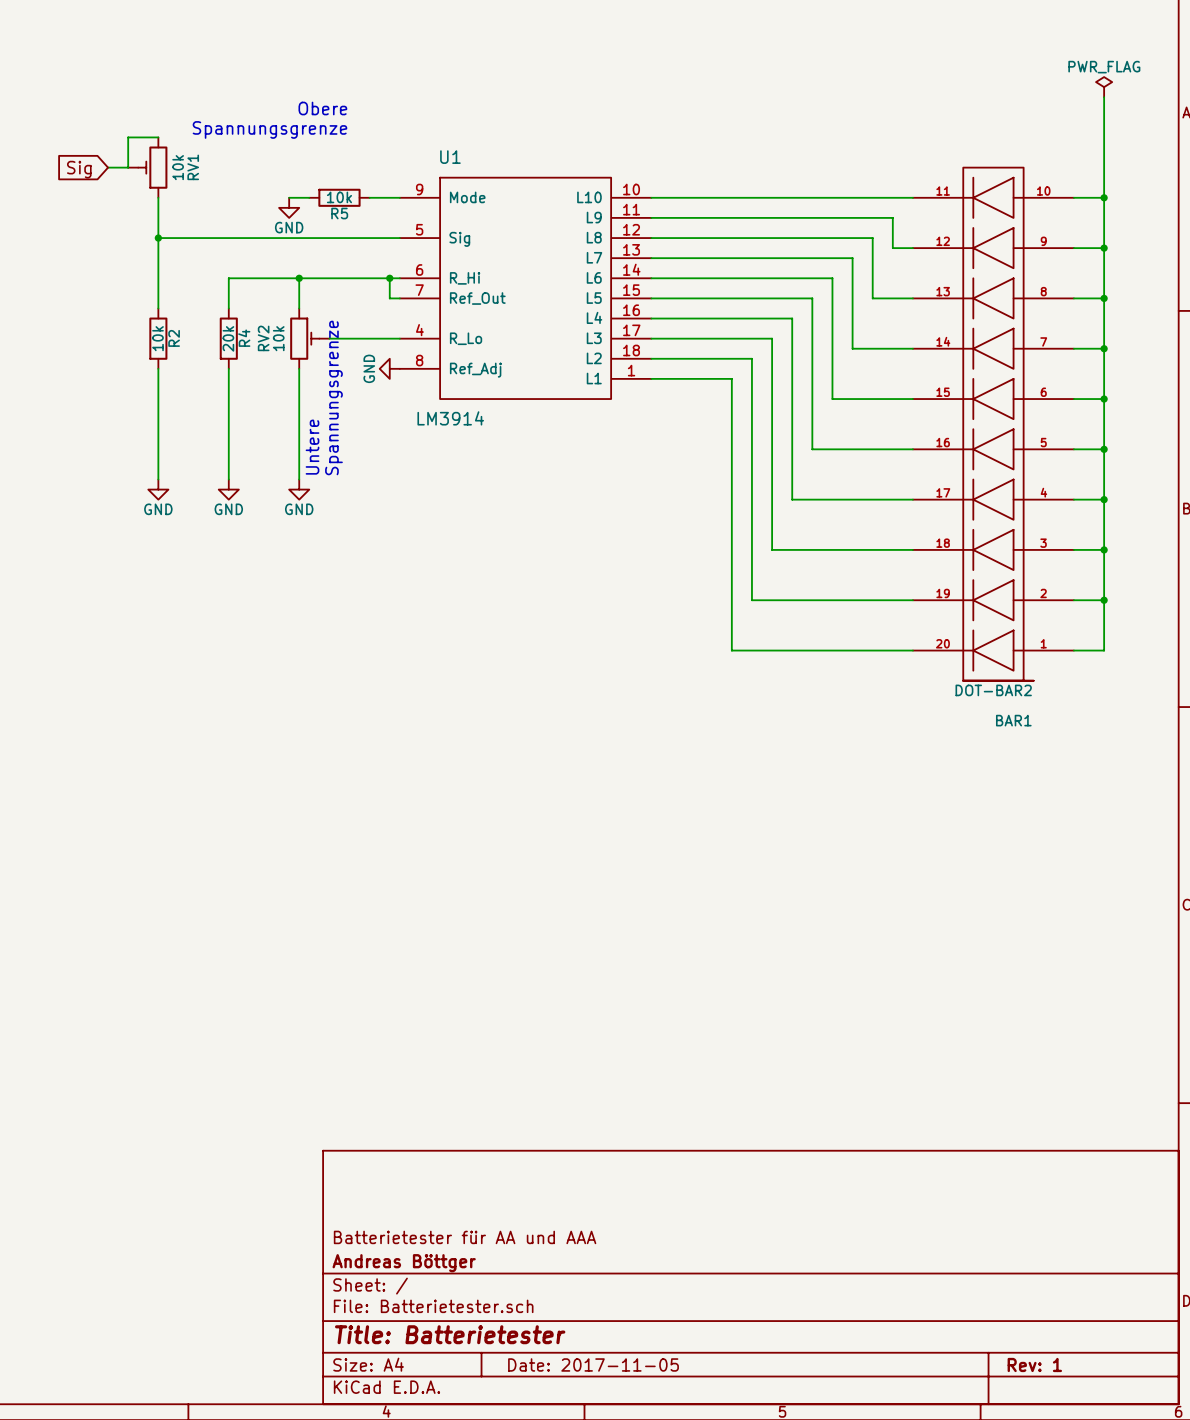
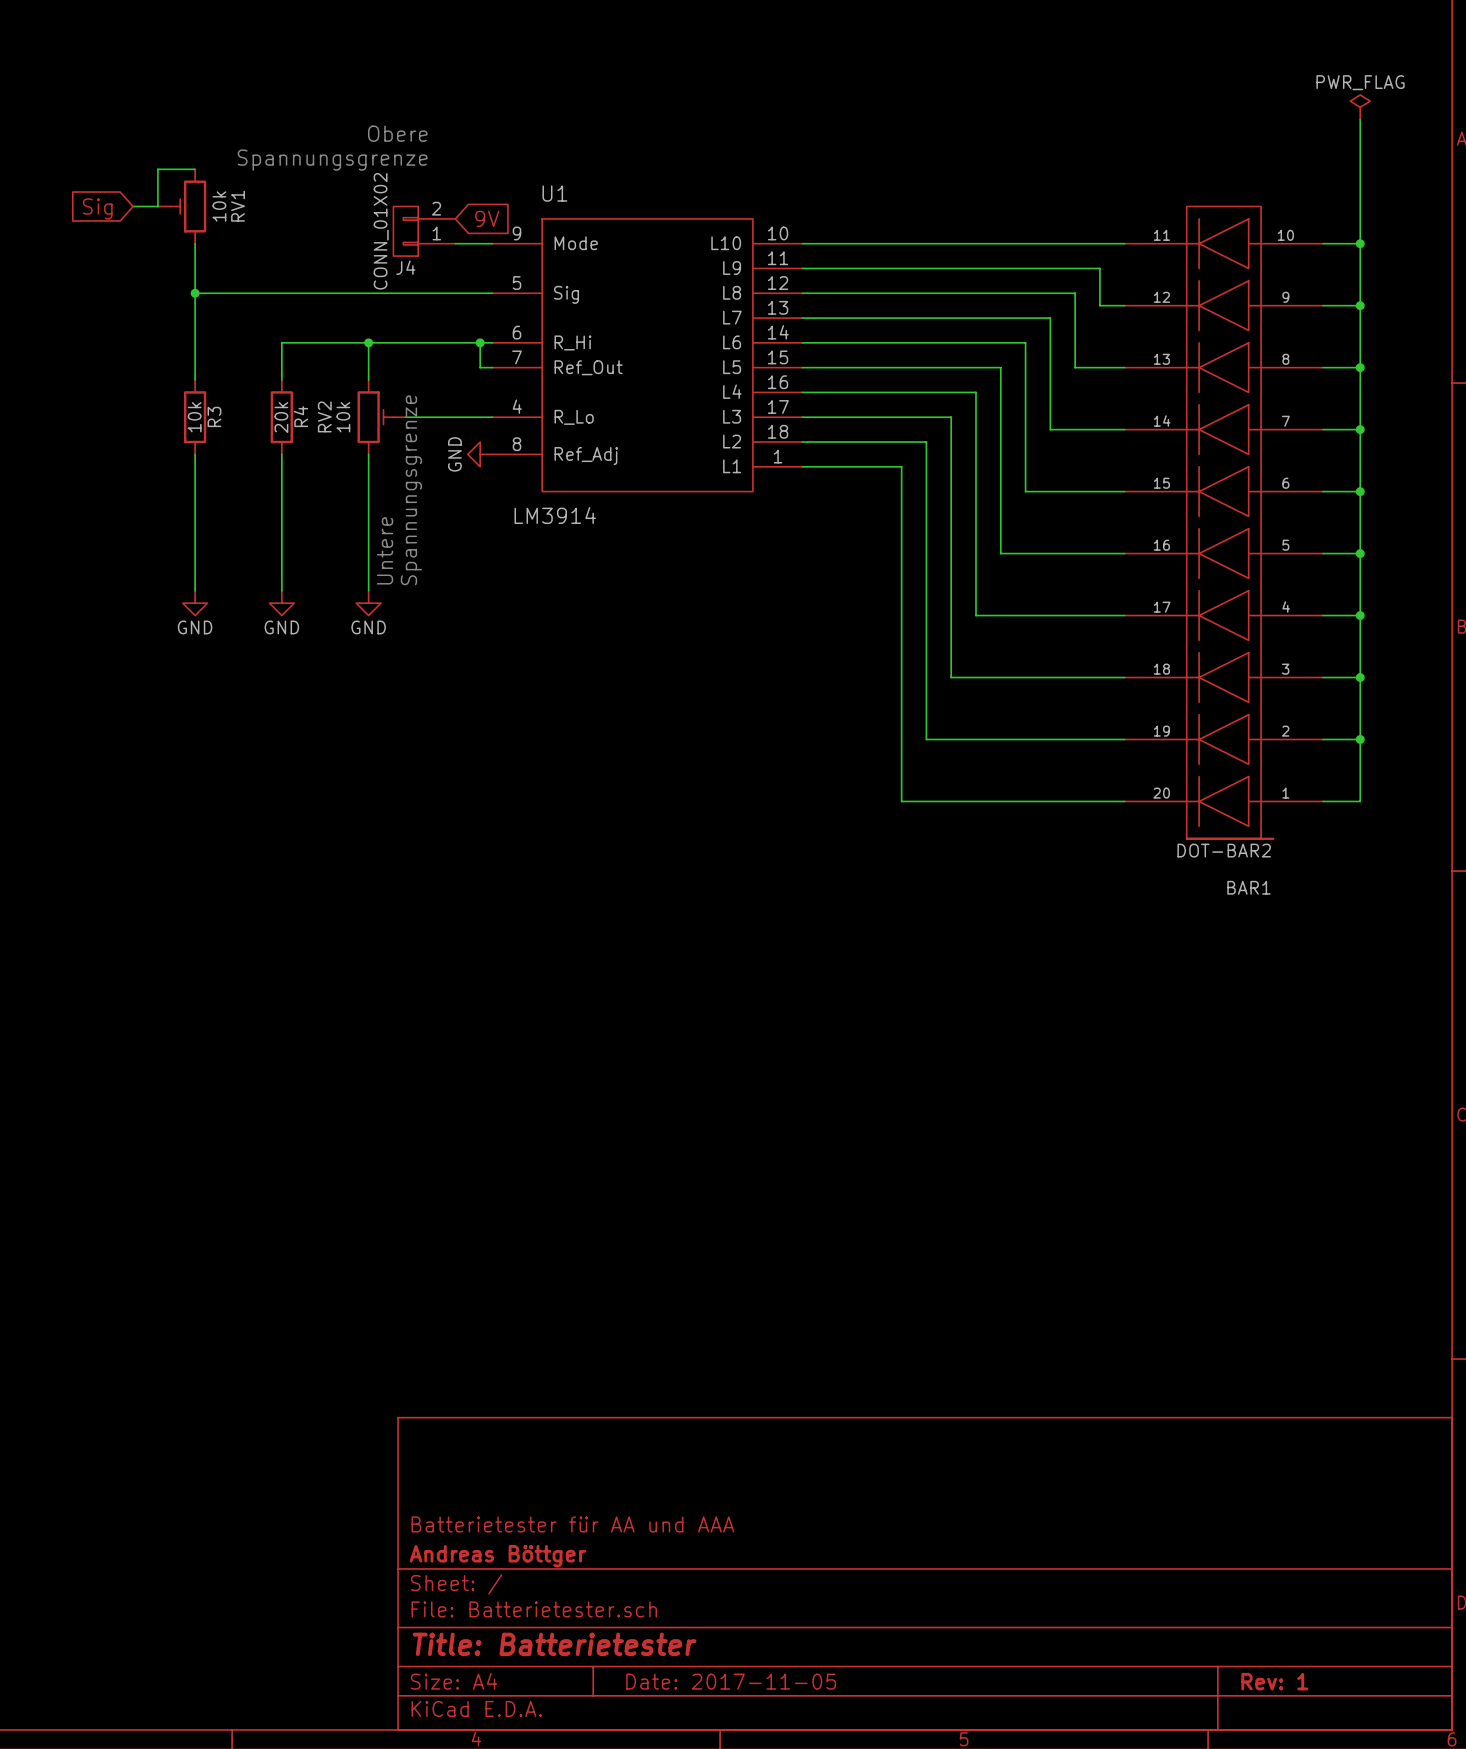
global label: none -> 9V (487, 218)
J4: none -> CONN_01X02 (424, 231)
wire: (289, 197) (309, 197) -> none
R5: 10k (339, 197) -> none
power symbol: GND (289, 207) -> none
R2 name: R2 (174, 338) -> R3 (214, 416)

